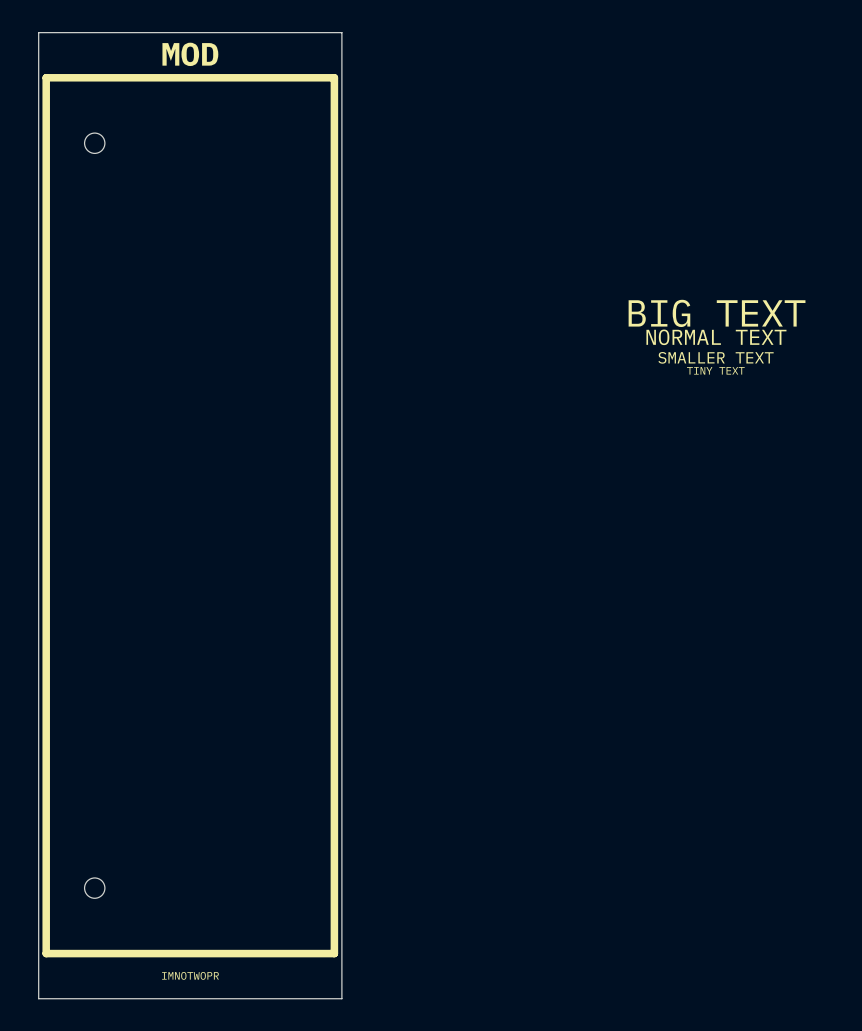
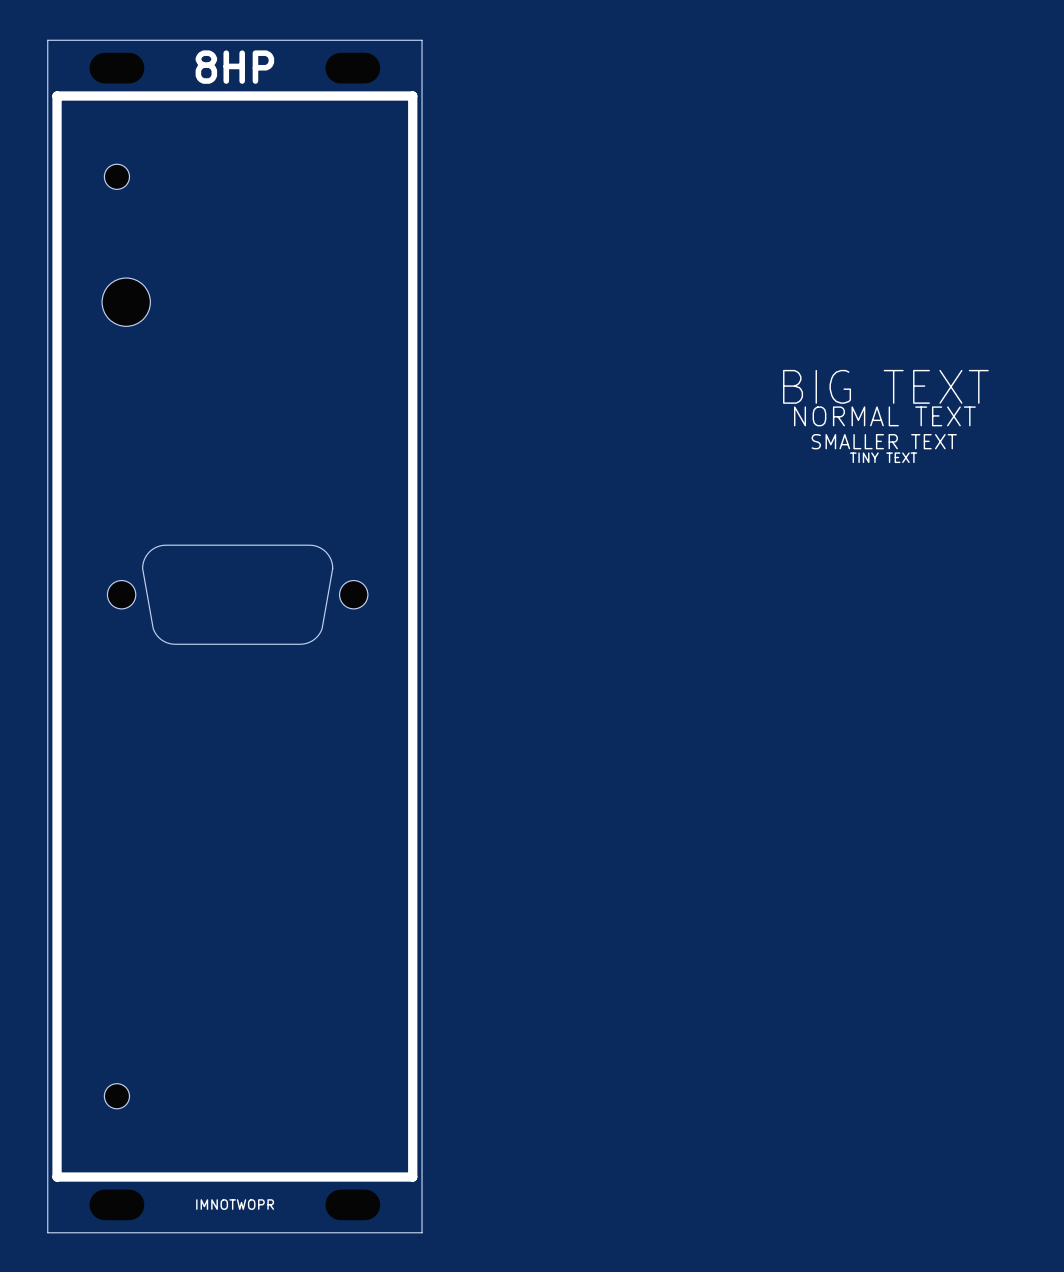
text: MOD (190, 54) -> 8HP (234, 67)
part: none -> (126, 302)
part: none -> (237, 594)

